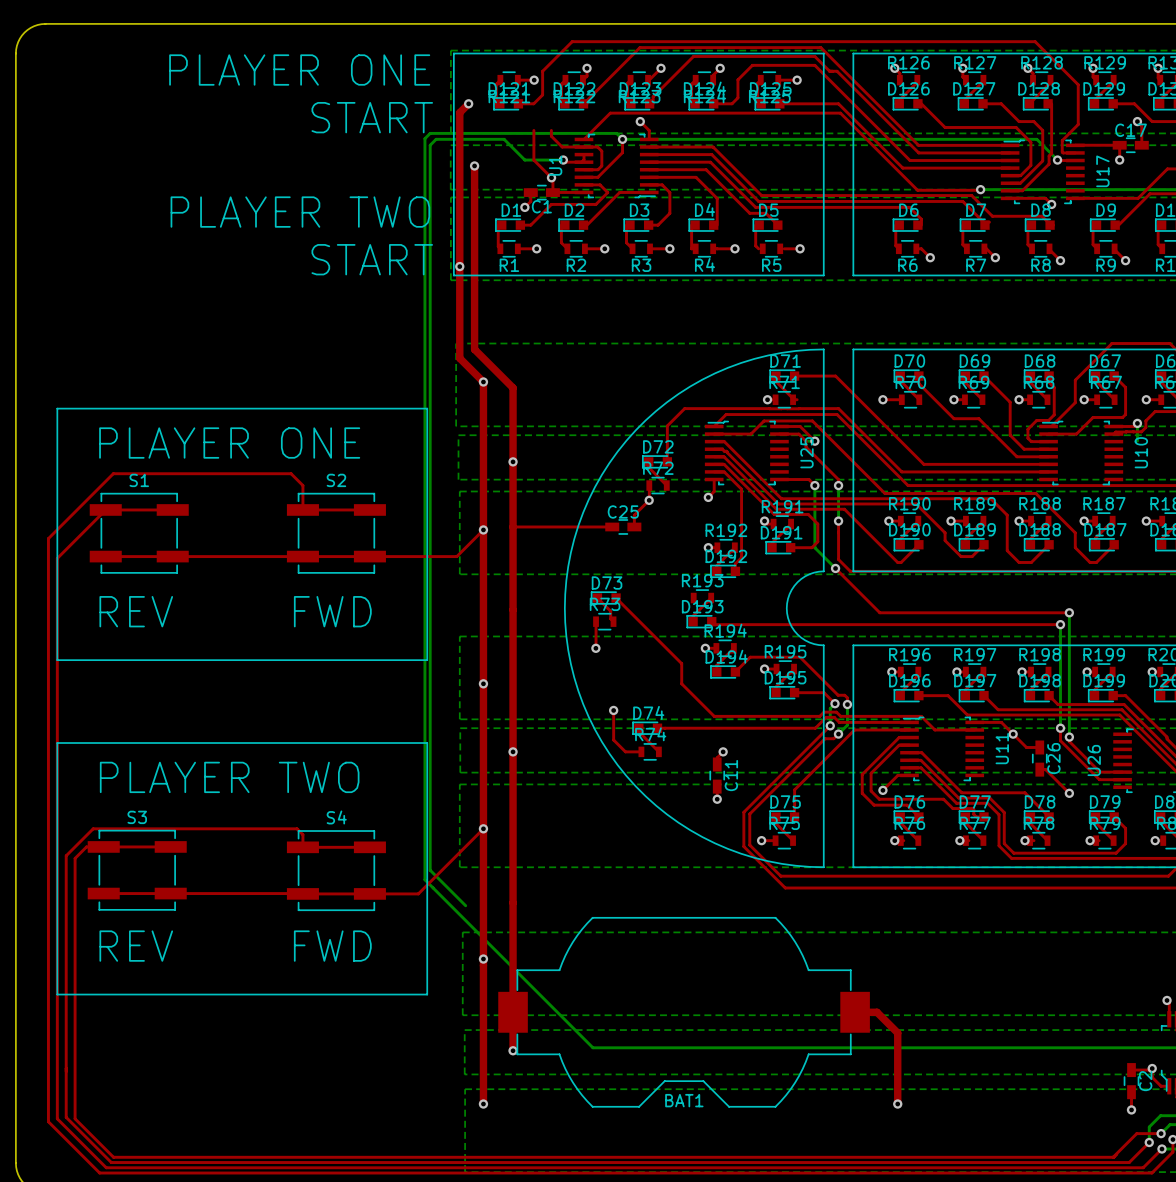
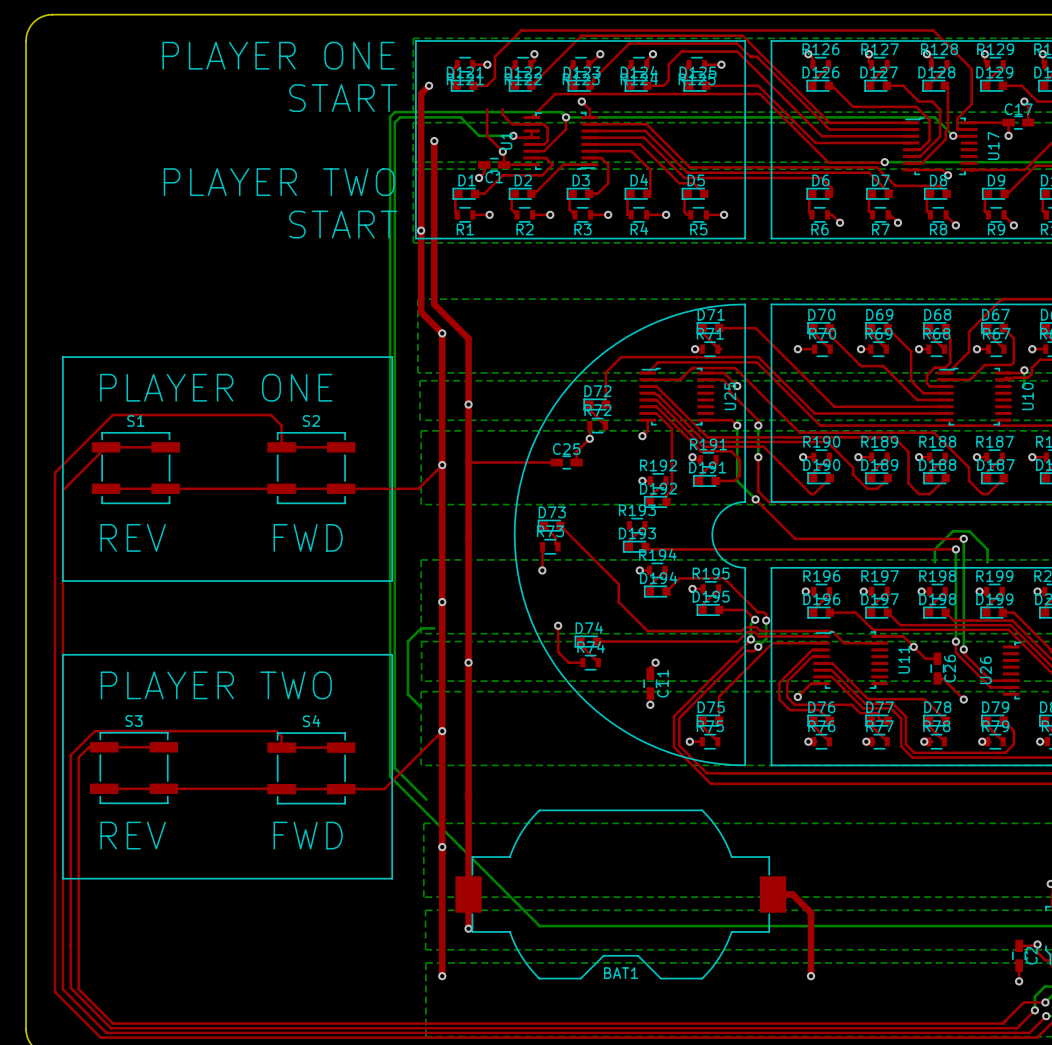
bottom track: none -> (934, 562) (934, 549) (952, 531) (969, 531) (987, 549) (987, 562)
bottom track: none -> (434, 628) (421, 628) (407, 641) (407, 694) (421, 707)

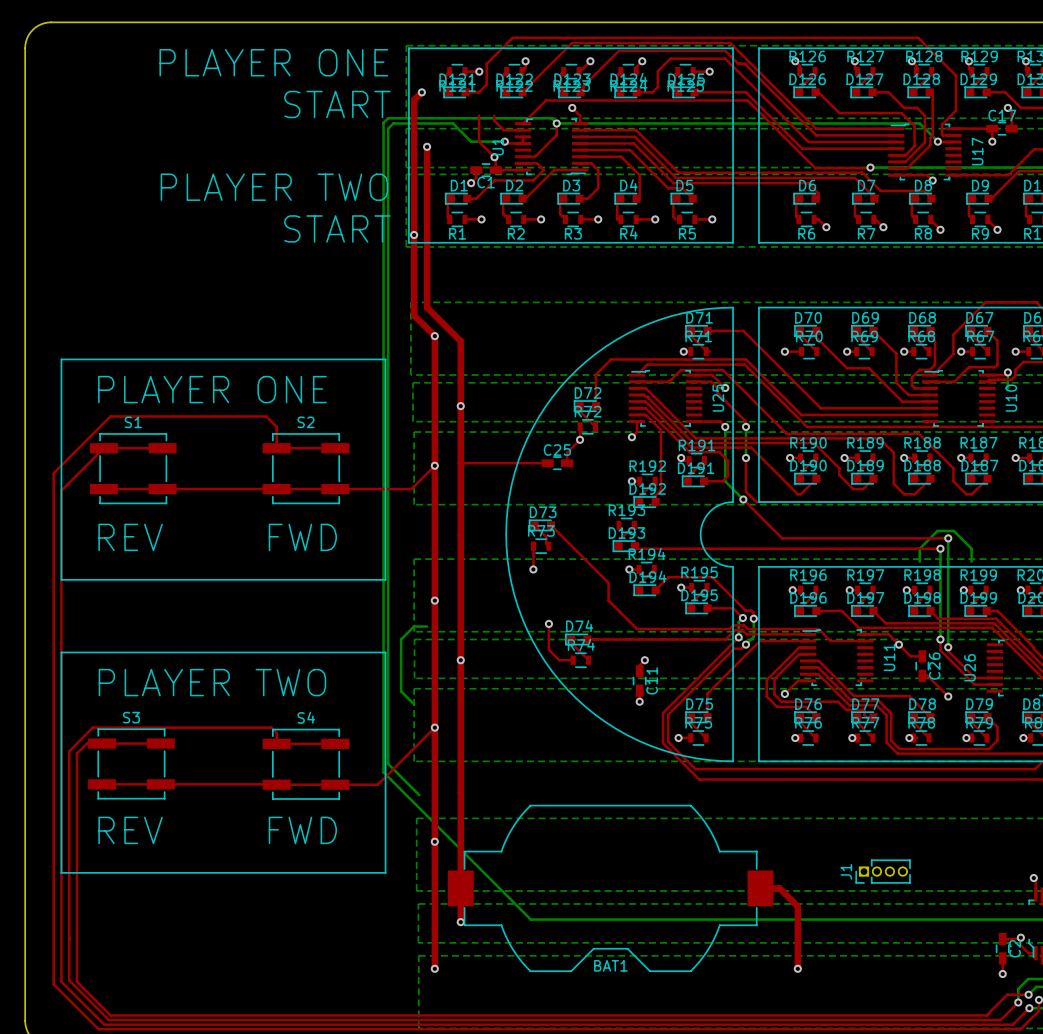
top track: (531, 124) (543, 124) (547, 127) (547, 141) (544, 144) (531, 144) -> none
J1: none -> (883, 871)

